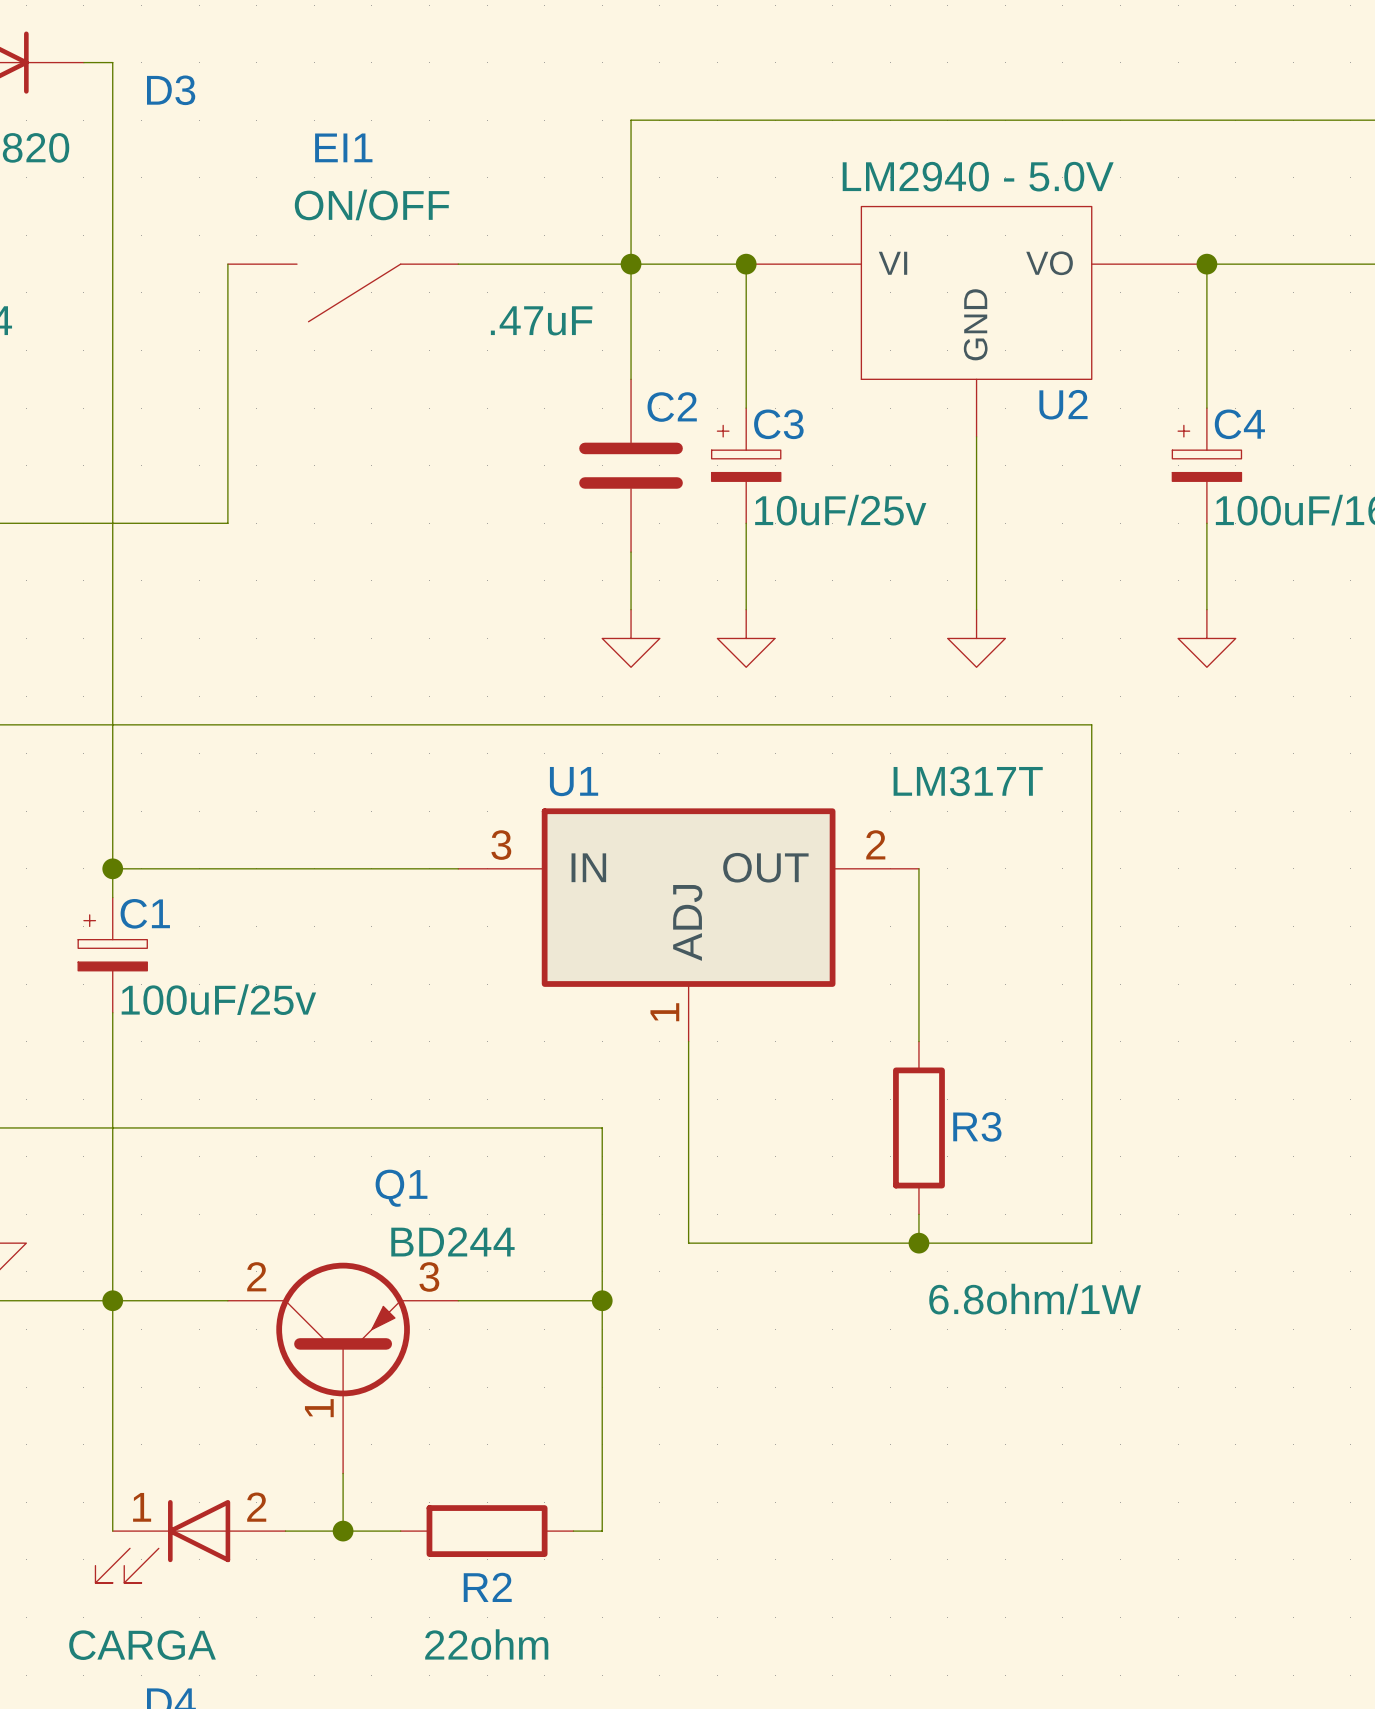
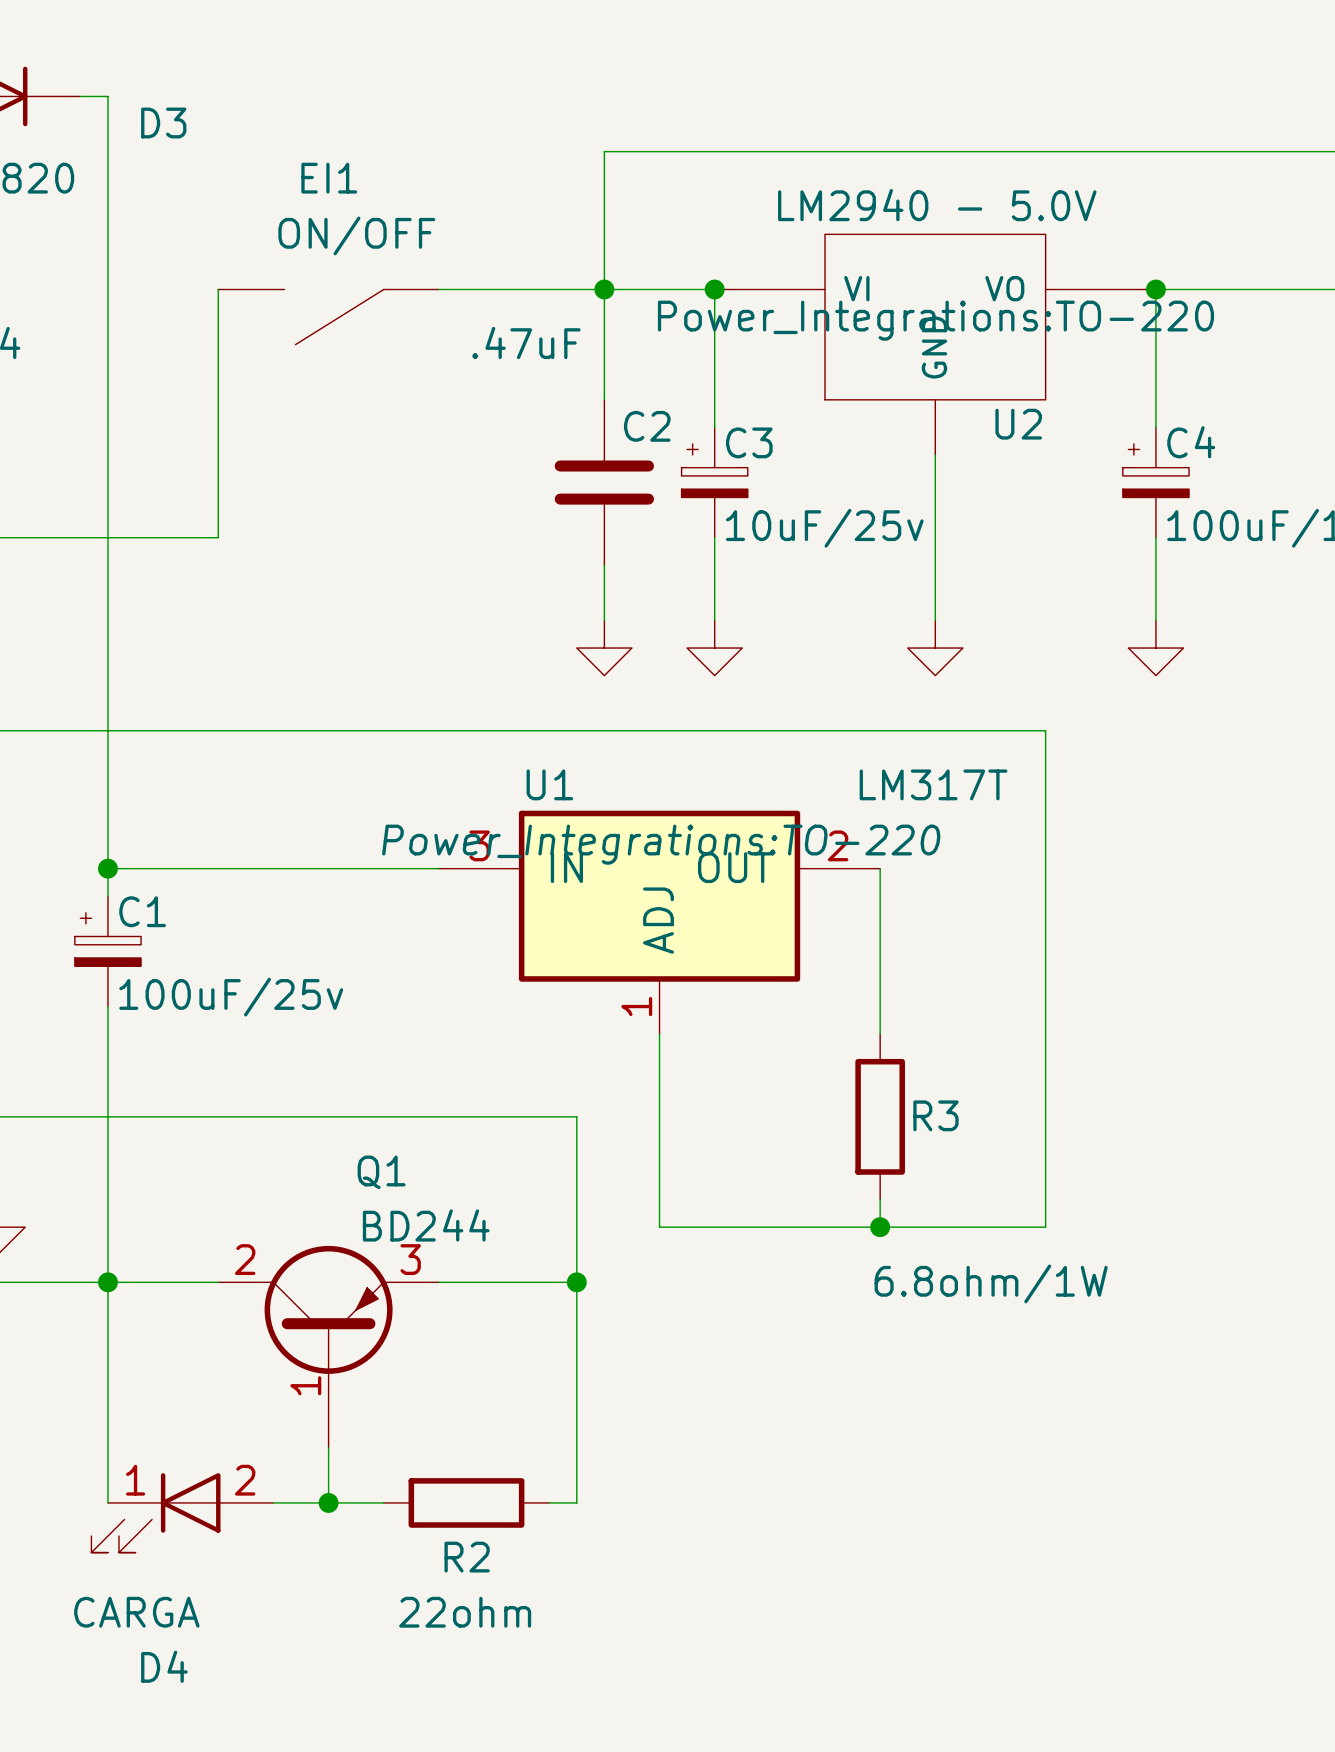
U2 text: none -> Power_Integrations:TO-220 (935, 320)
U1 text: none -> Power_Integrations:TO-220 (661, 844)

